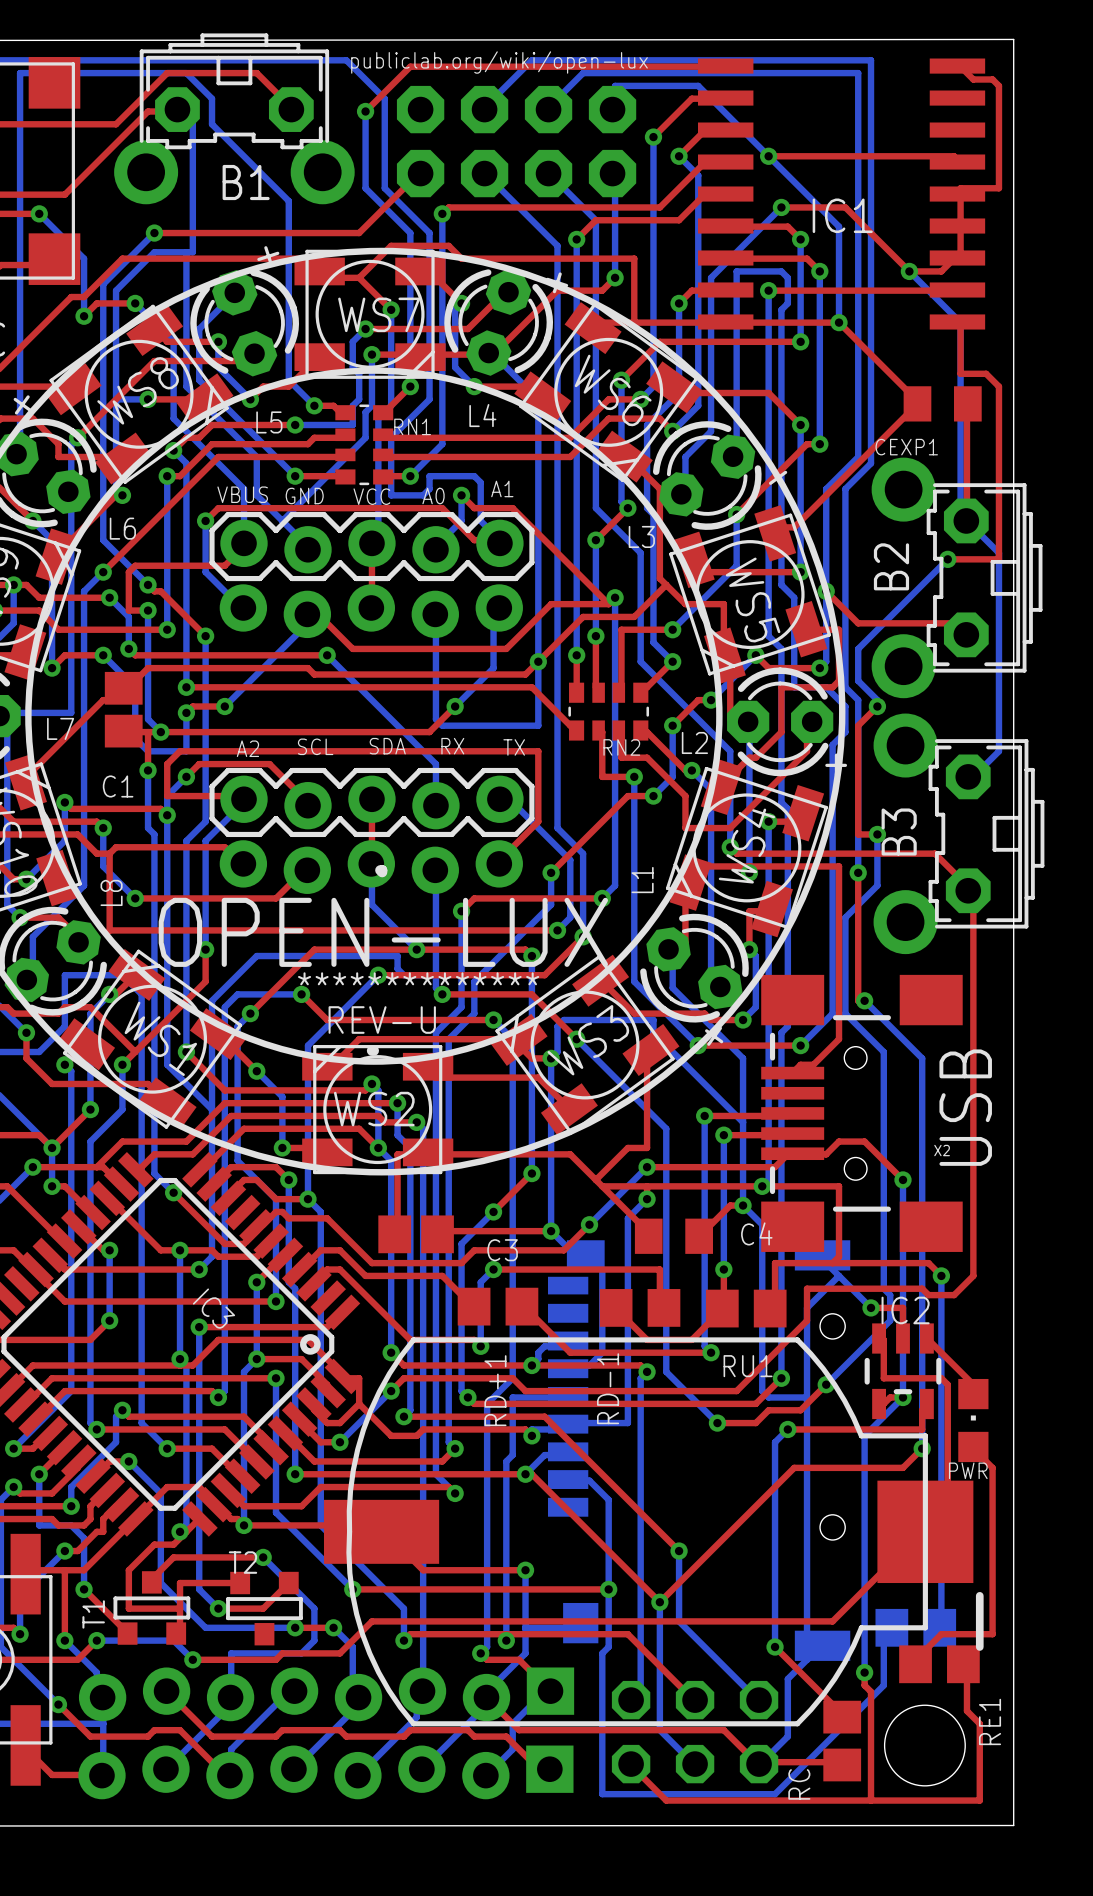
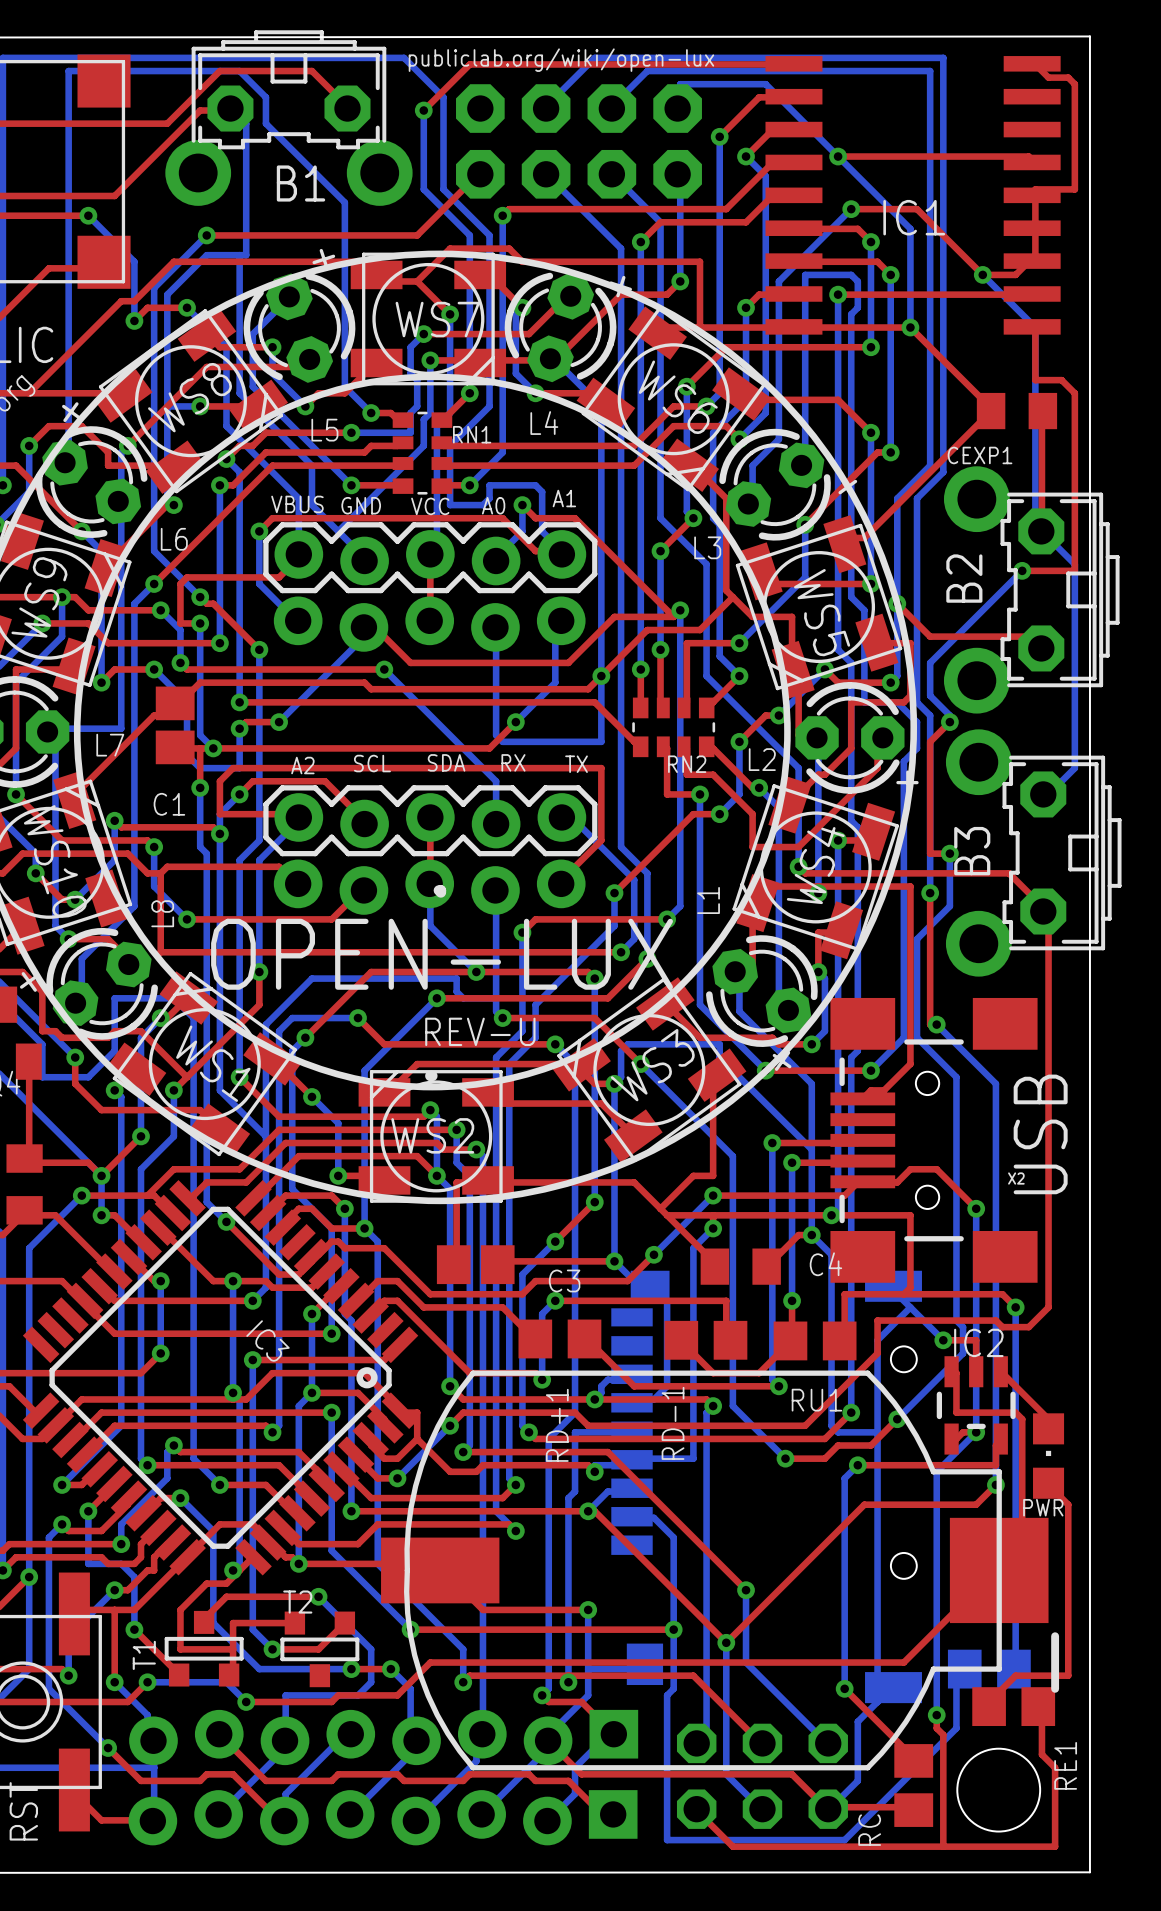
text: ************** (418, 978) -> none
text position: REV-U (382, 1020) -> REV-U (480, 1031)

